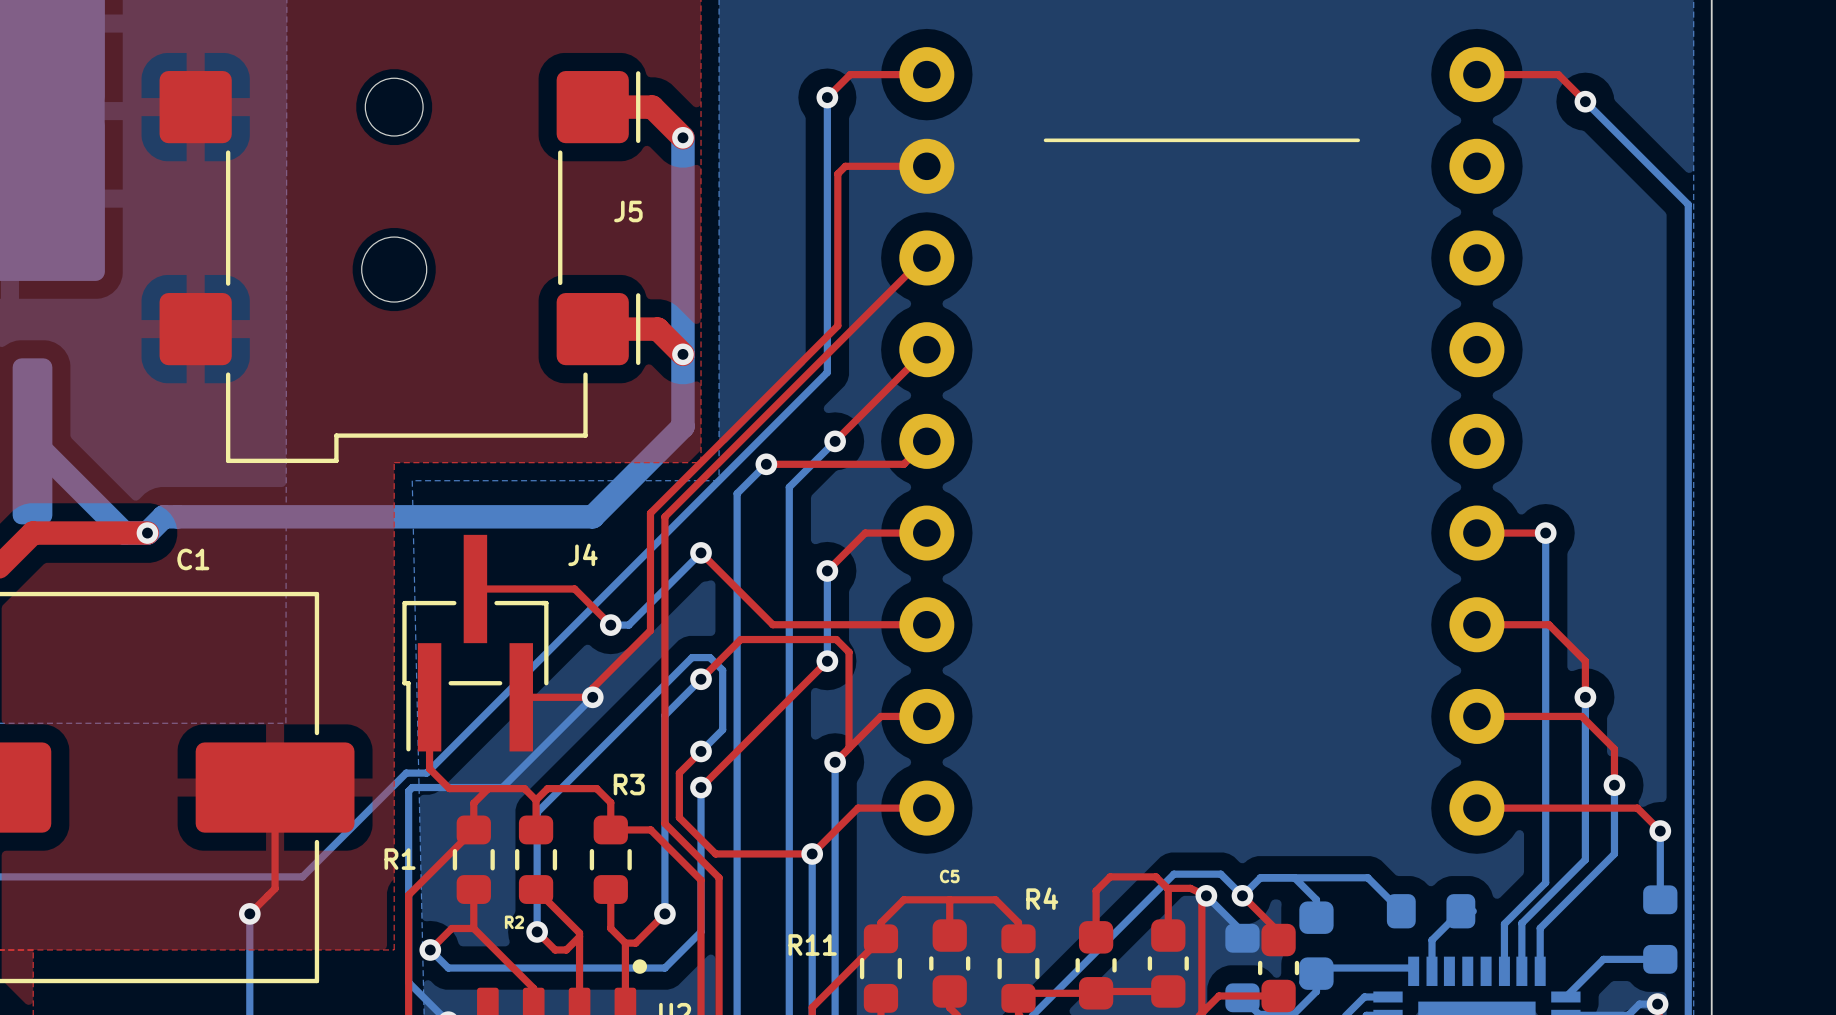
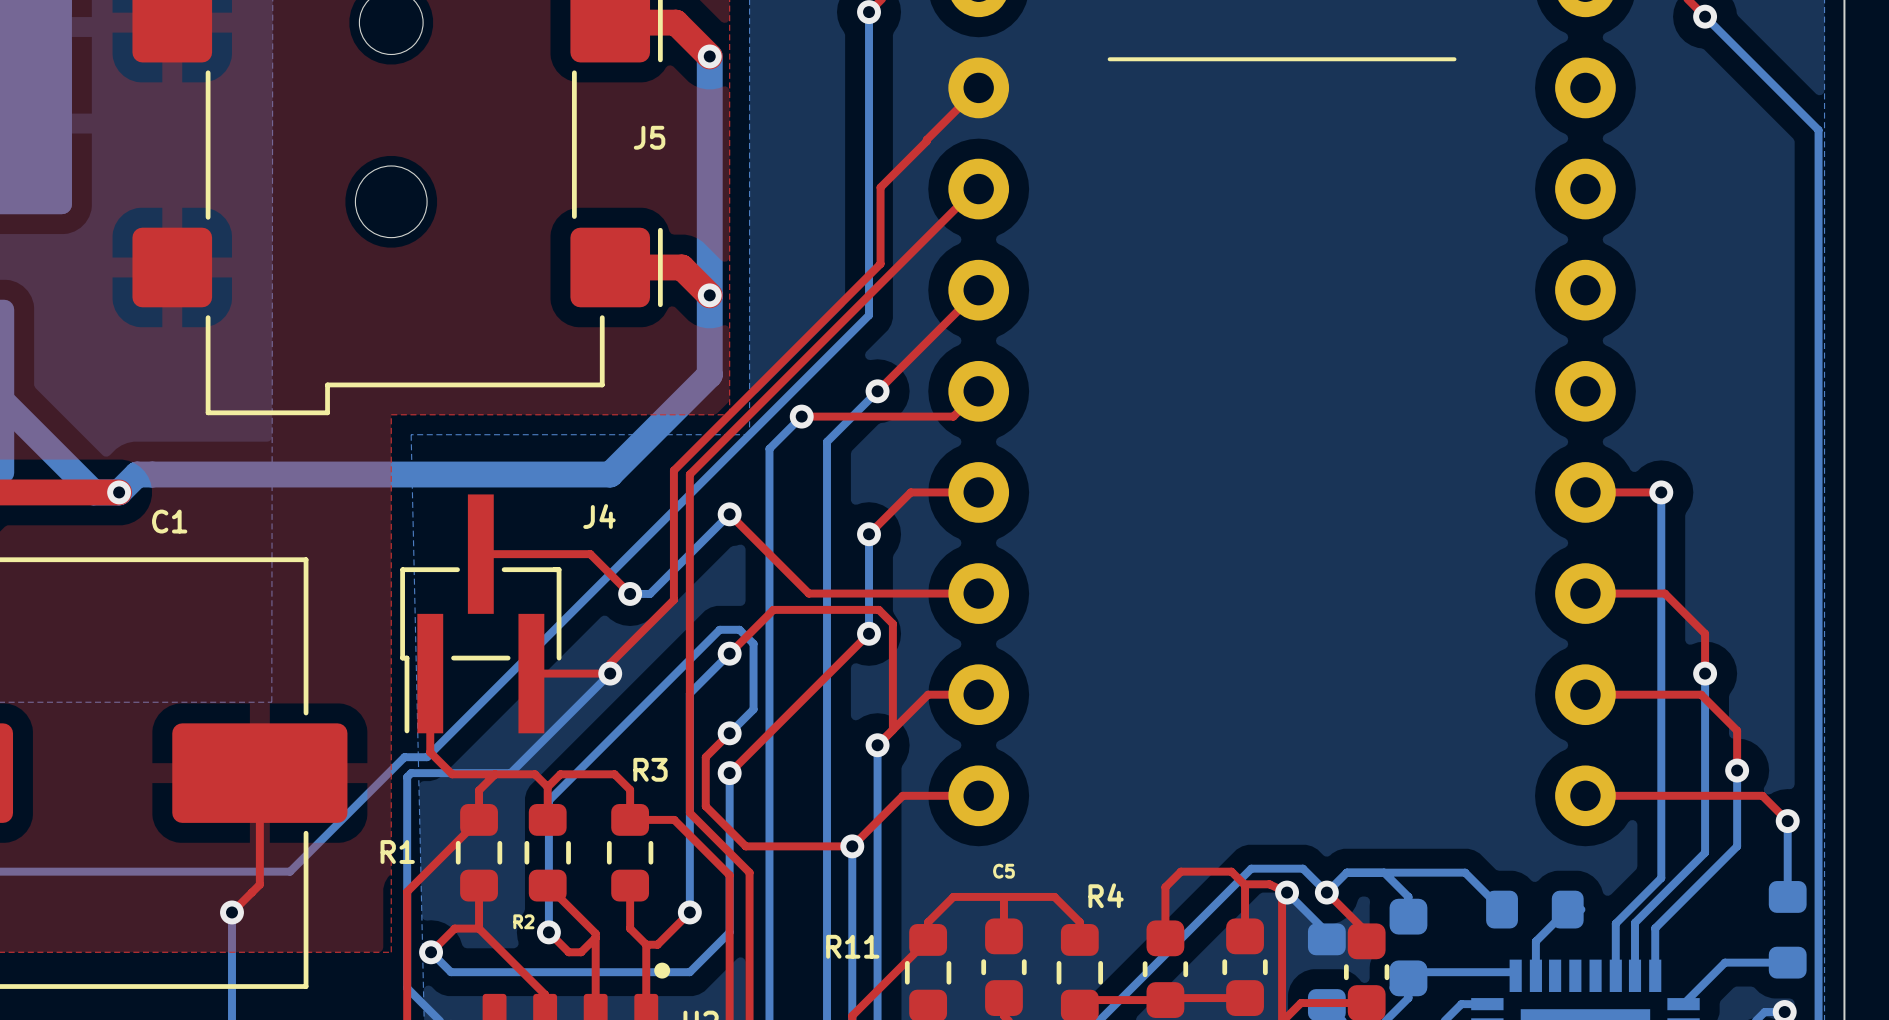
top track: (926, 166) (845, 166) (837, 173) (837, 256) -> (978, 87) (880, 187)

